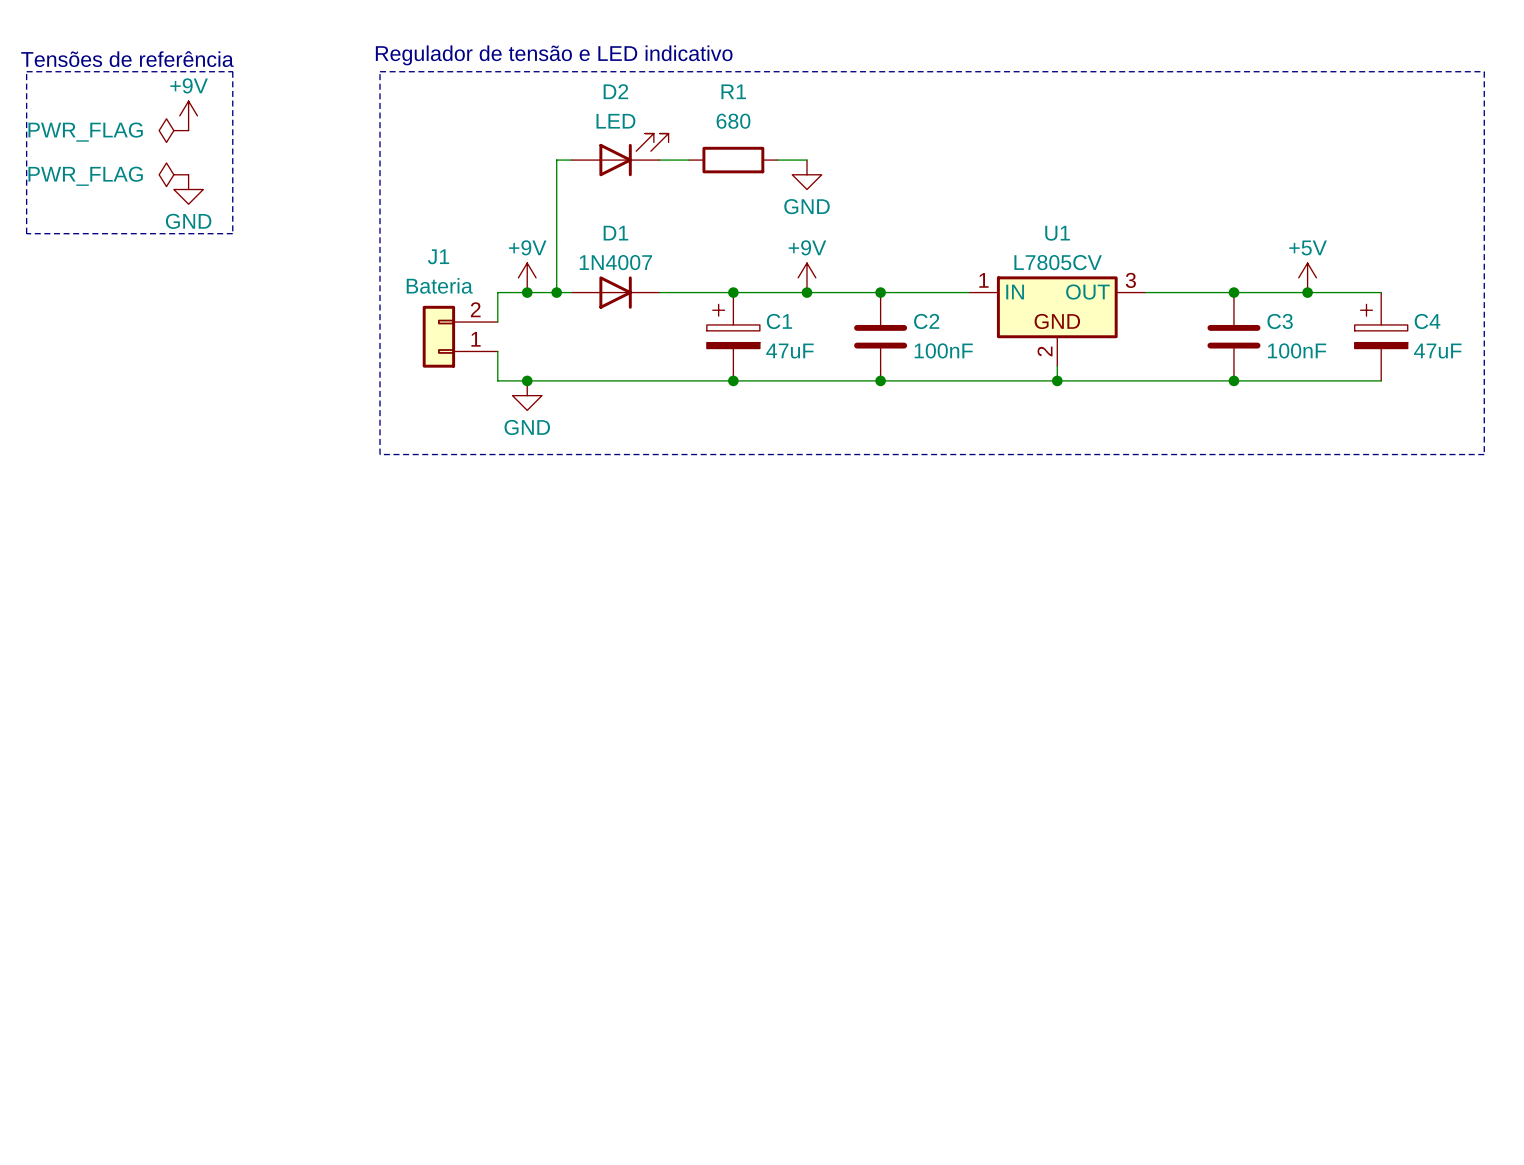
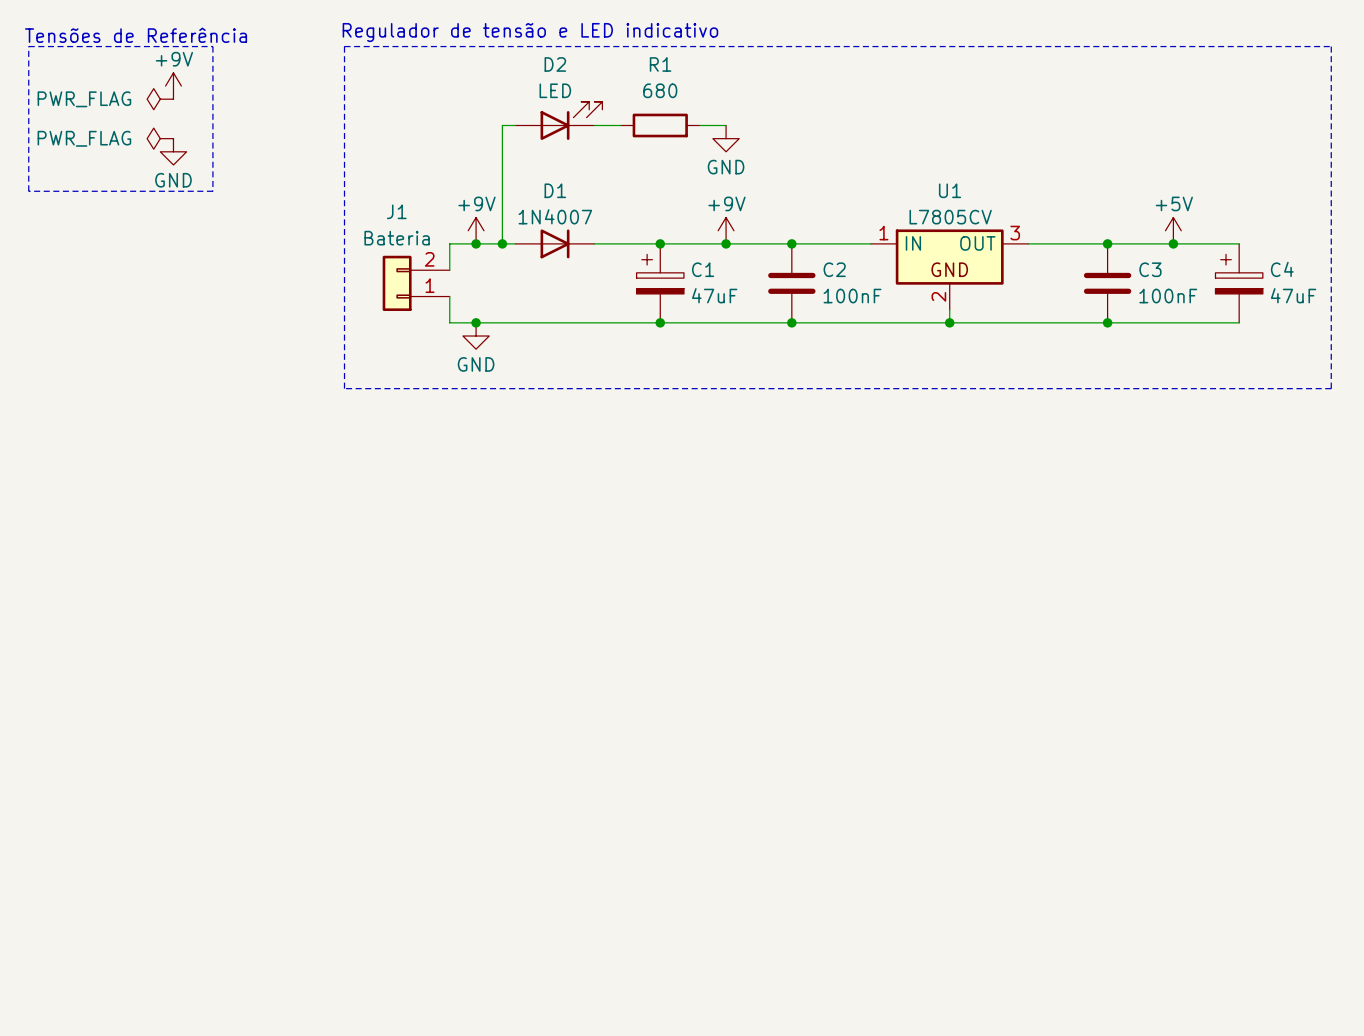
text: Tensões de referência (127, 59) -> Tensões de Referência (136, 35)

